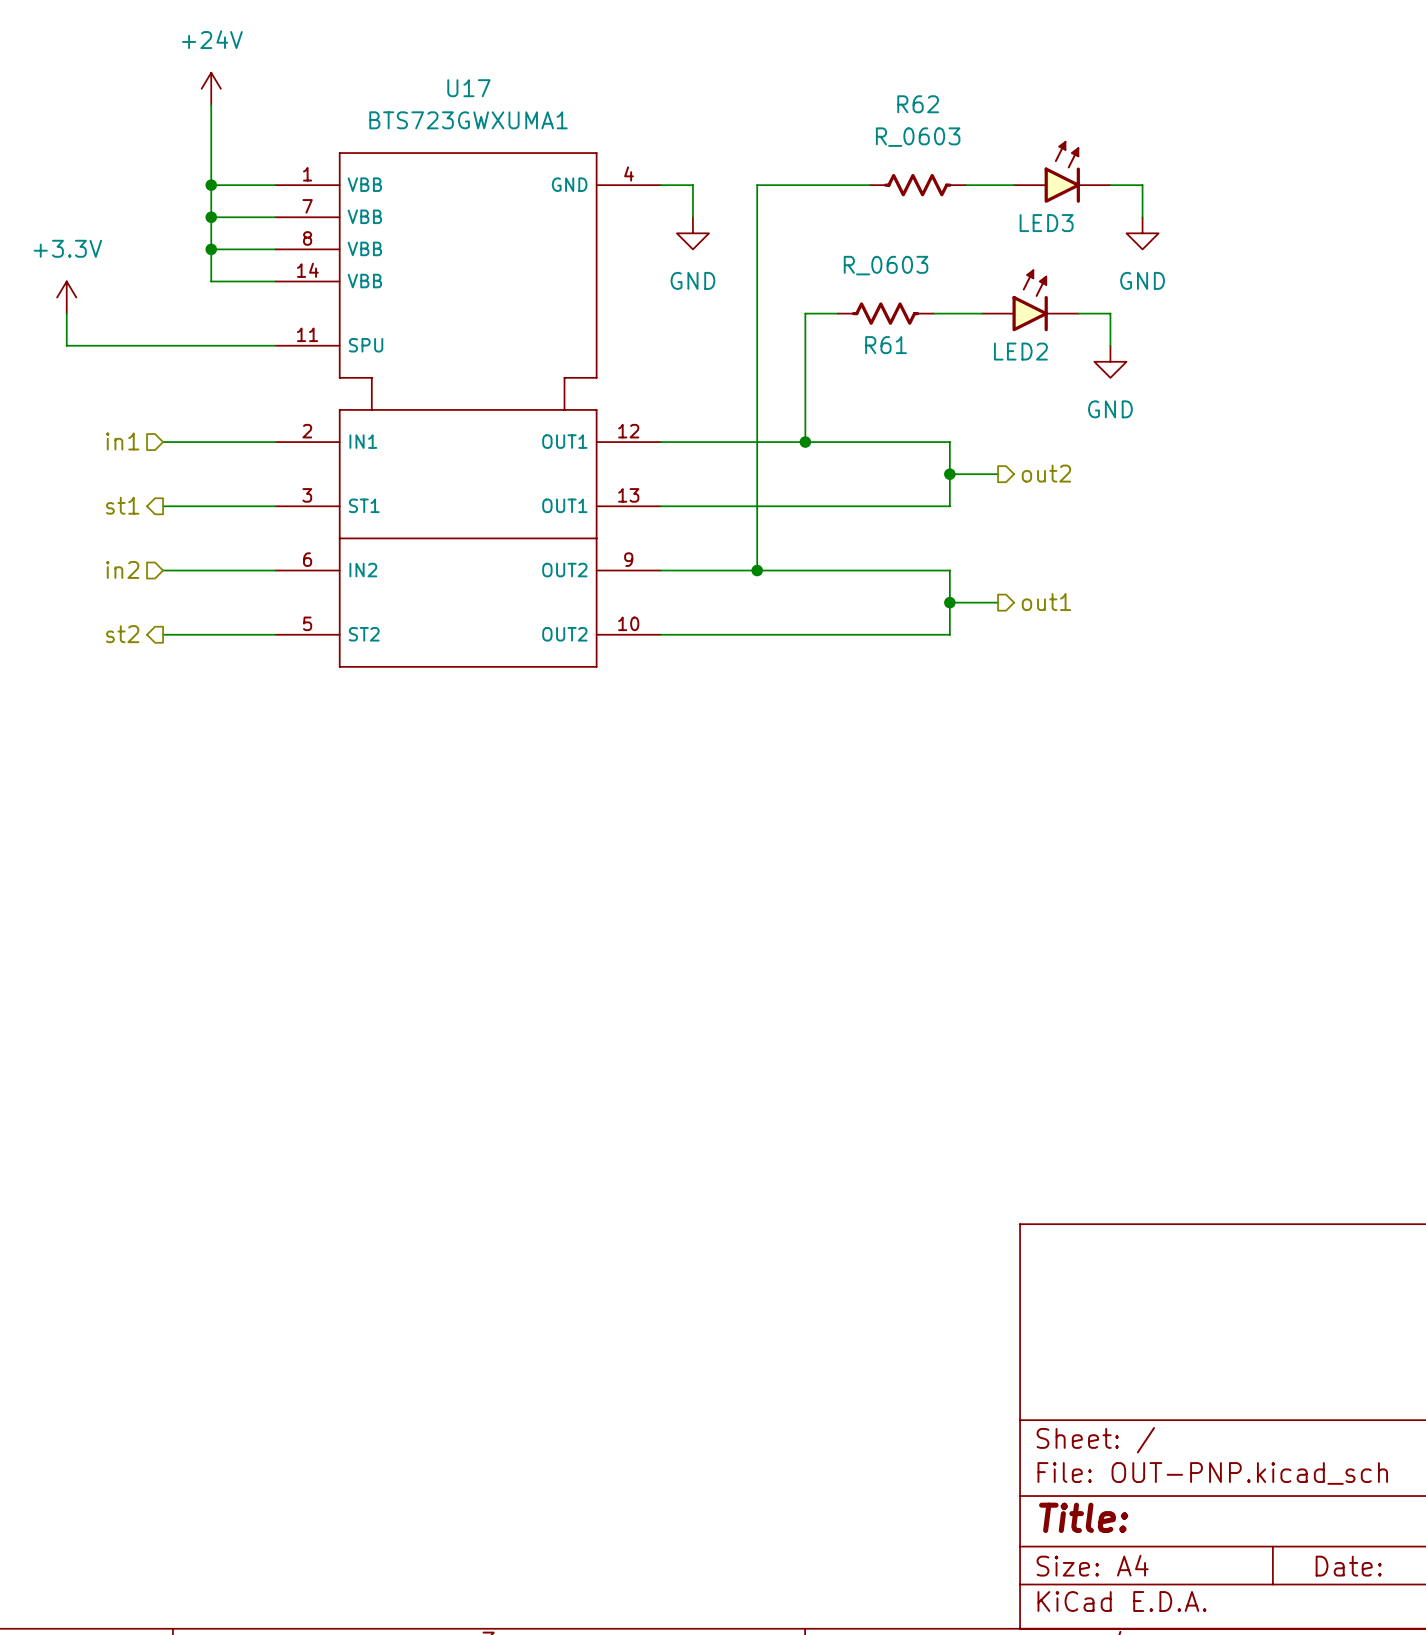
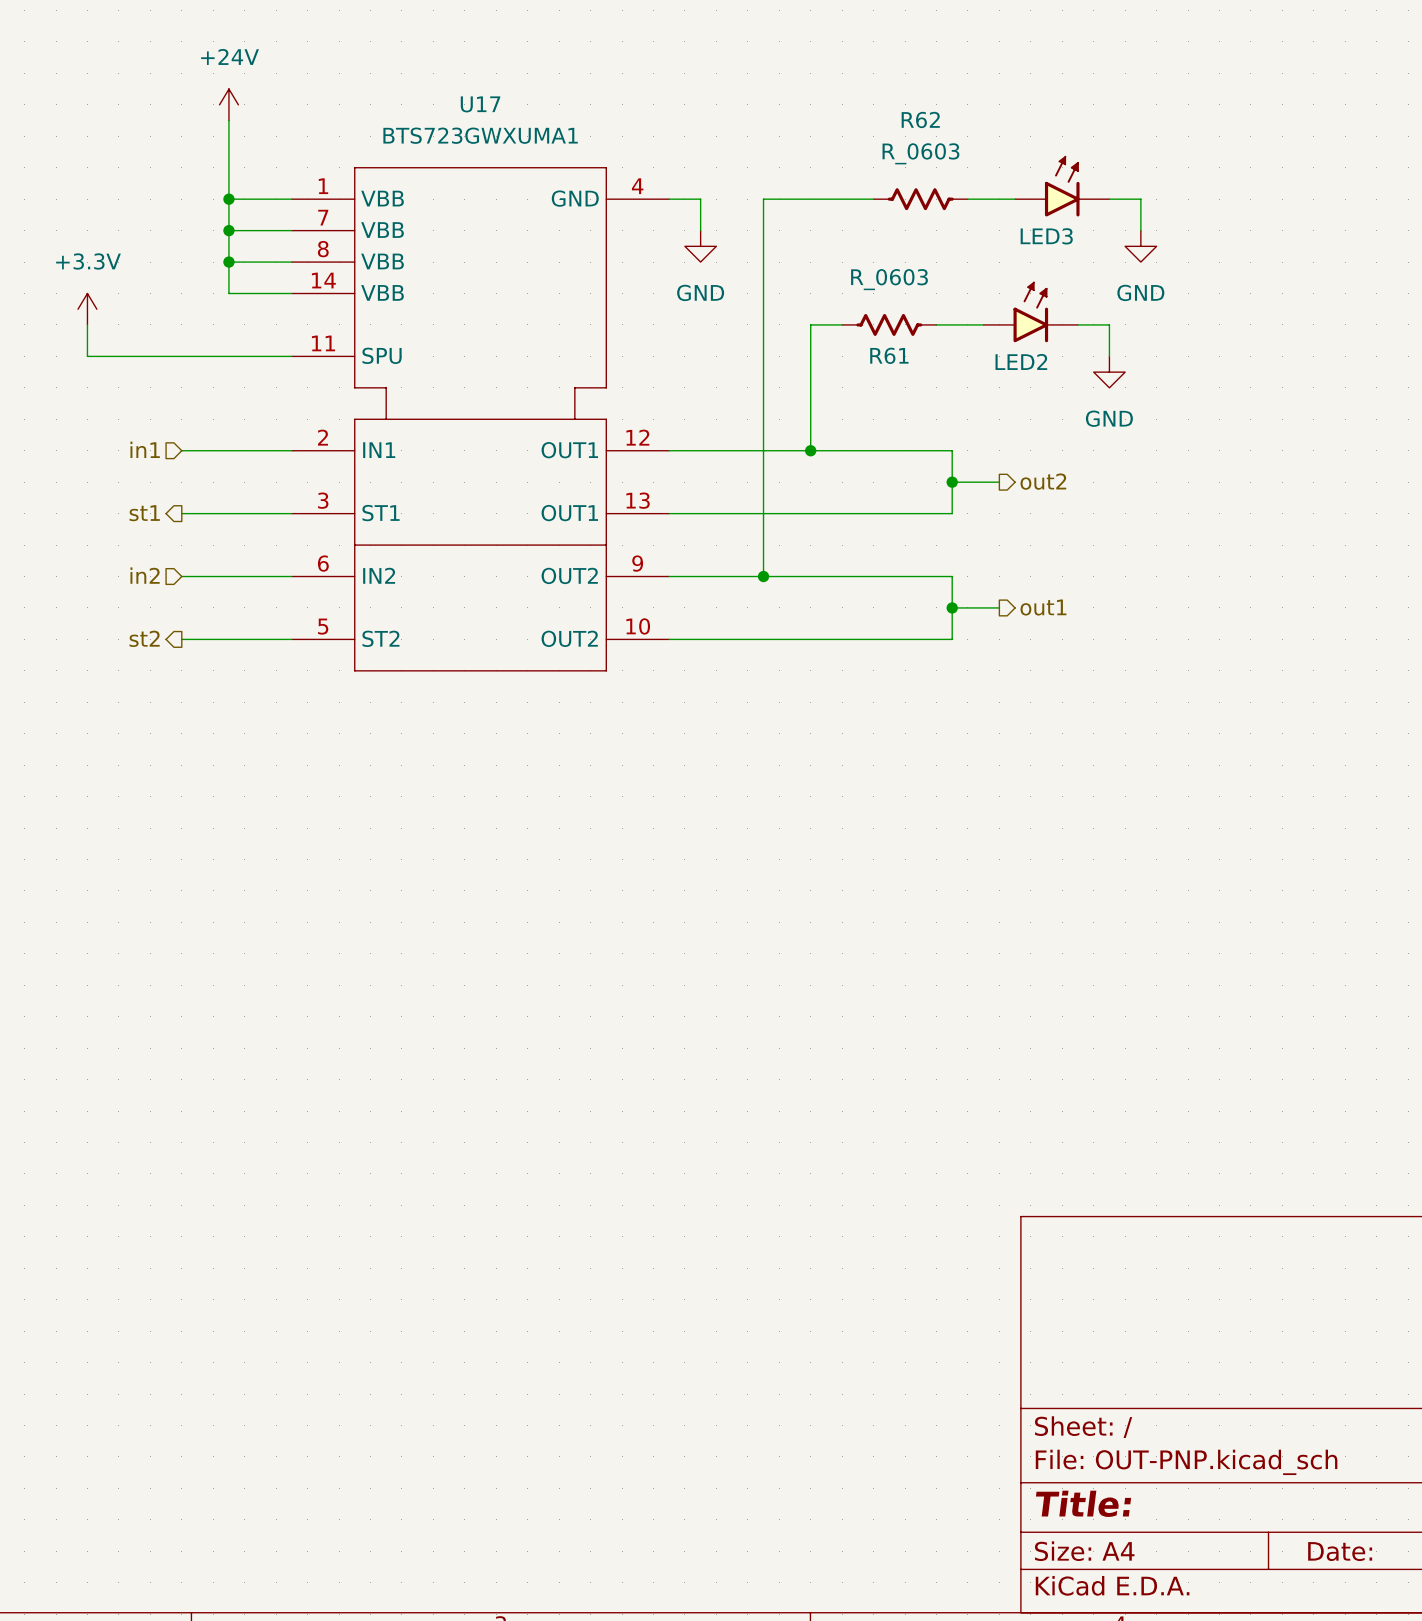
U17 symbol: [275, 153, 661, 667] -> [291, 167, 670, 671]

